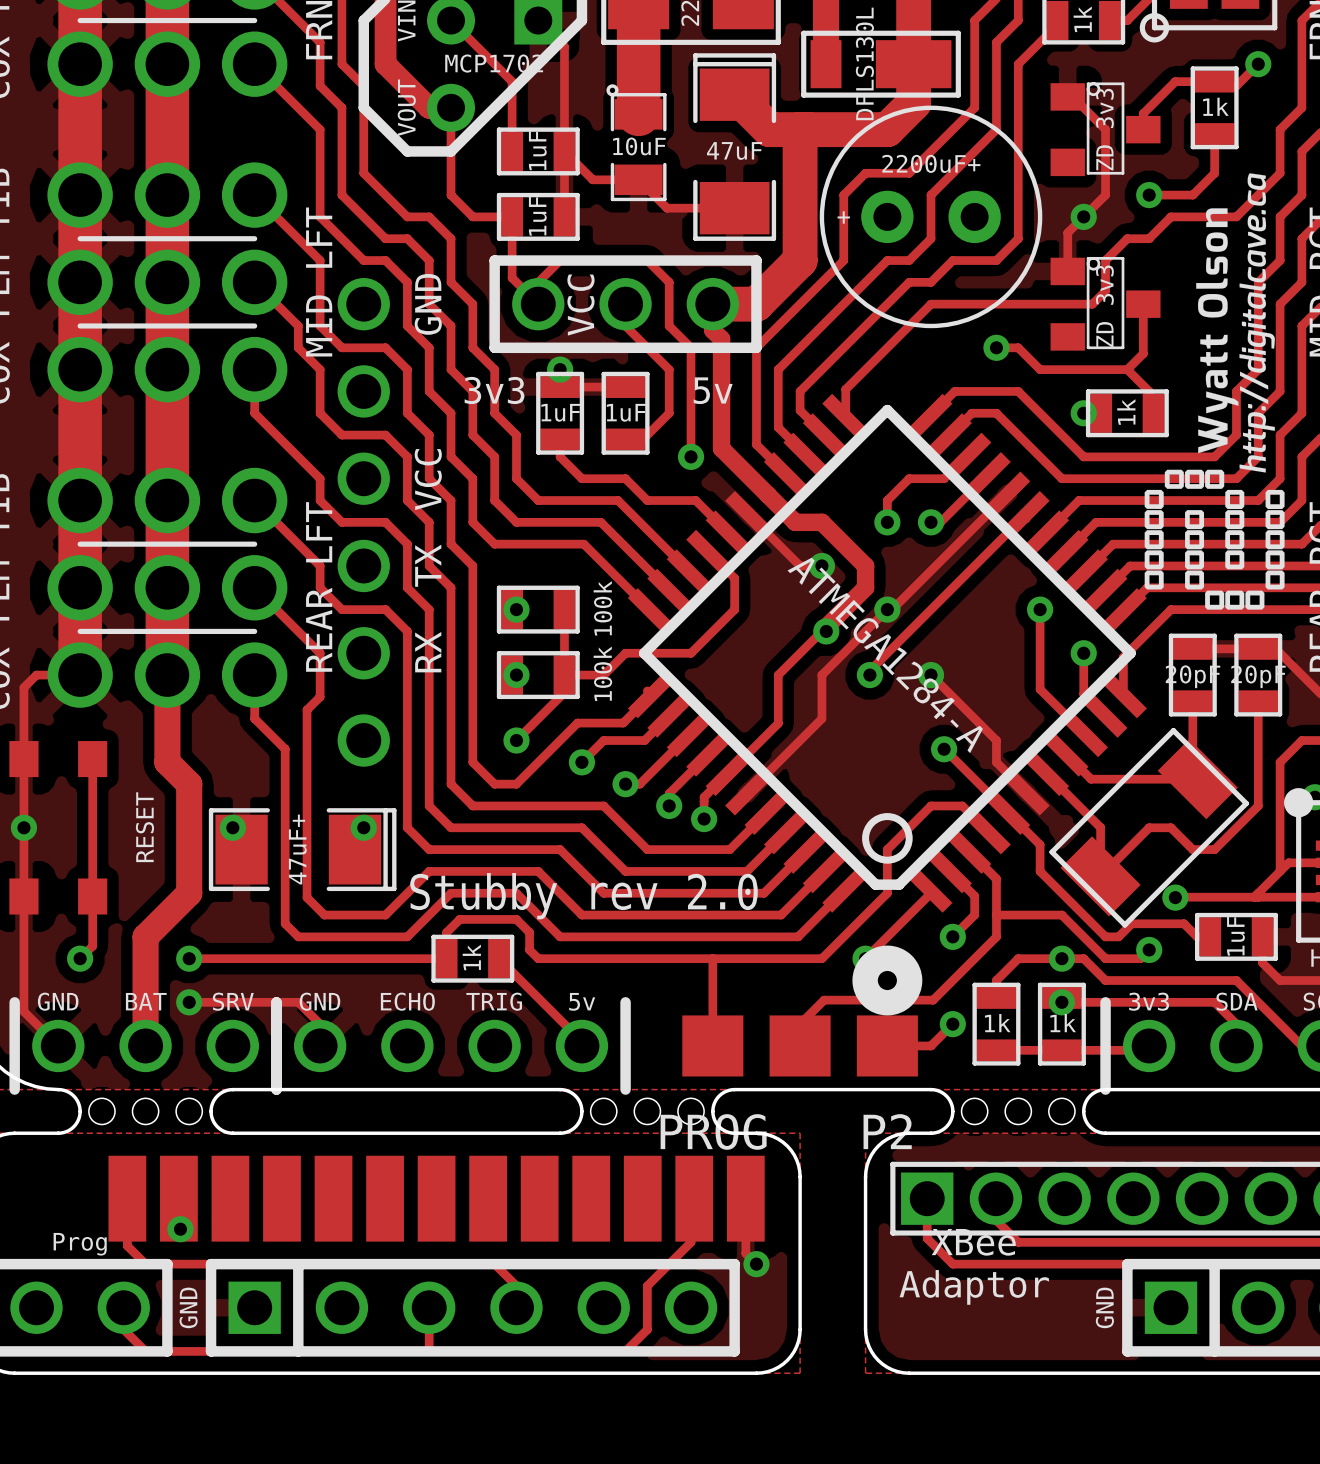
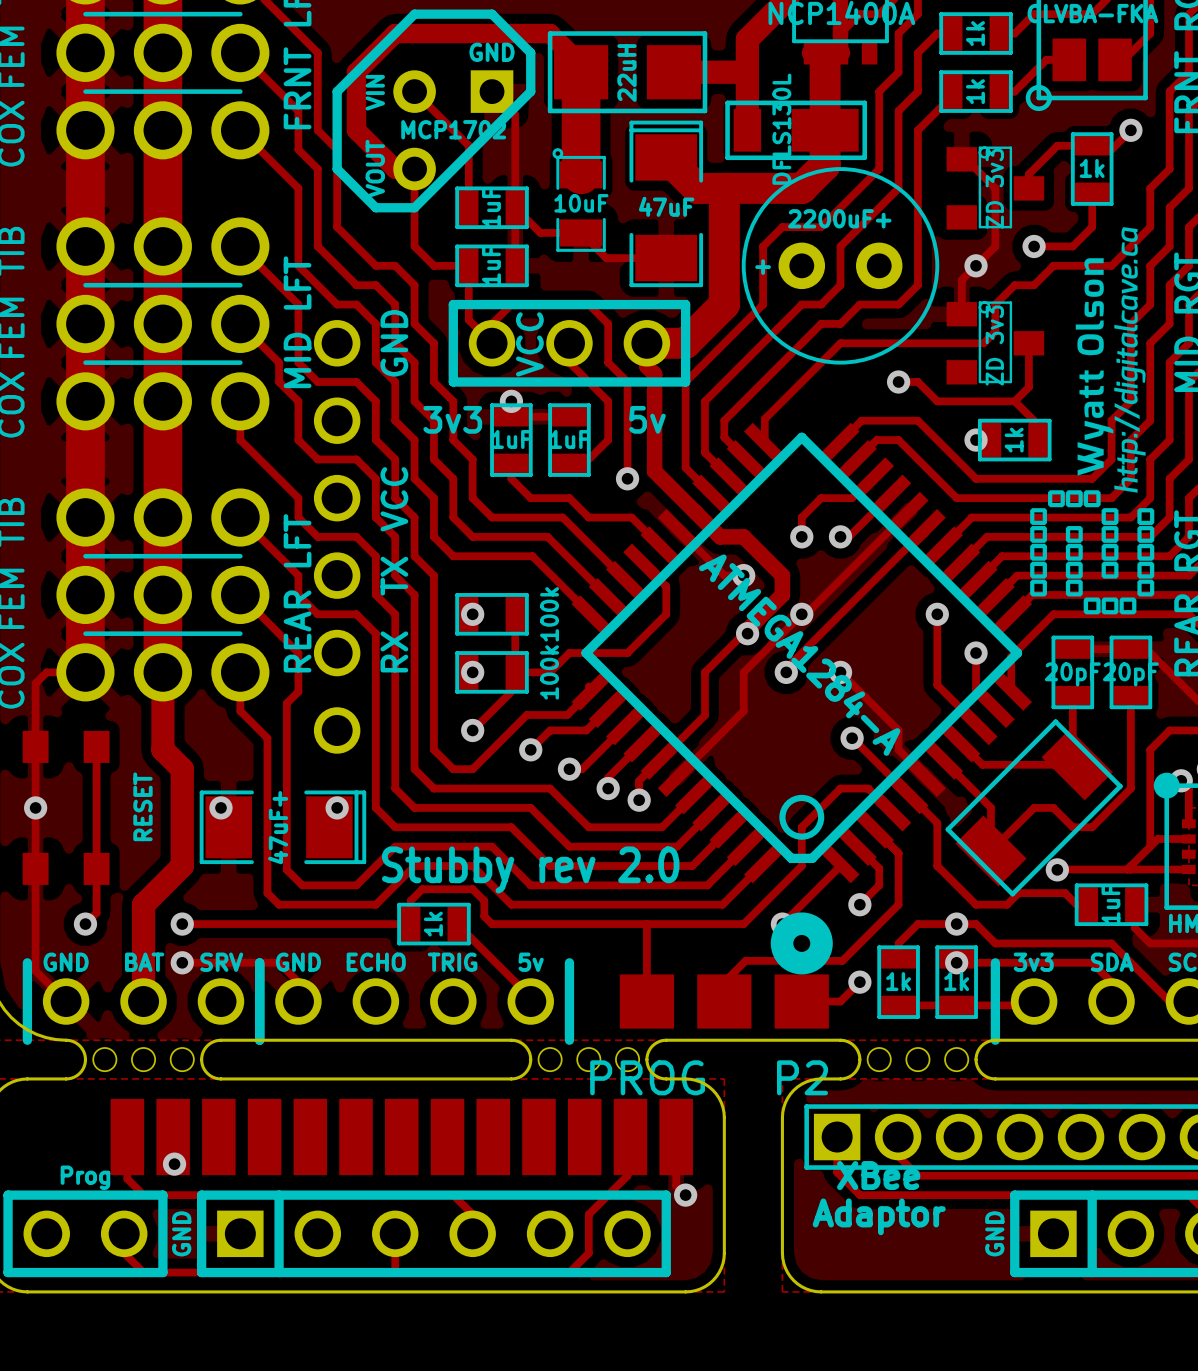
track: (1040, 871) (1105, 936) -> (937, 846) (937, 866) (956, 885)
track: (996, 915) (1061, 915) -> none
track: (1083, 936) (1105, 958) (1140, 958) (1149, 949) -> (976, 904) (995, 904)
via: (1149, 949) -> none

